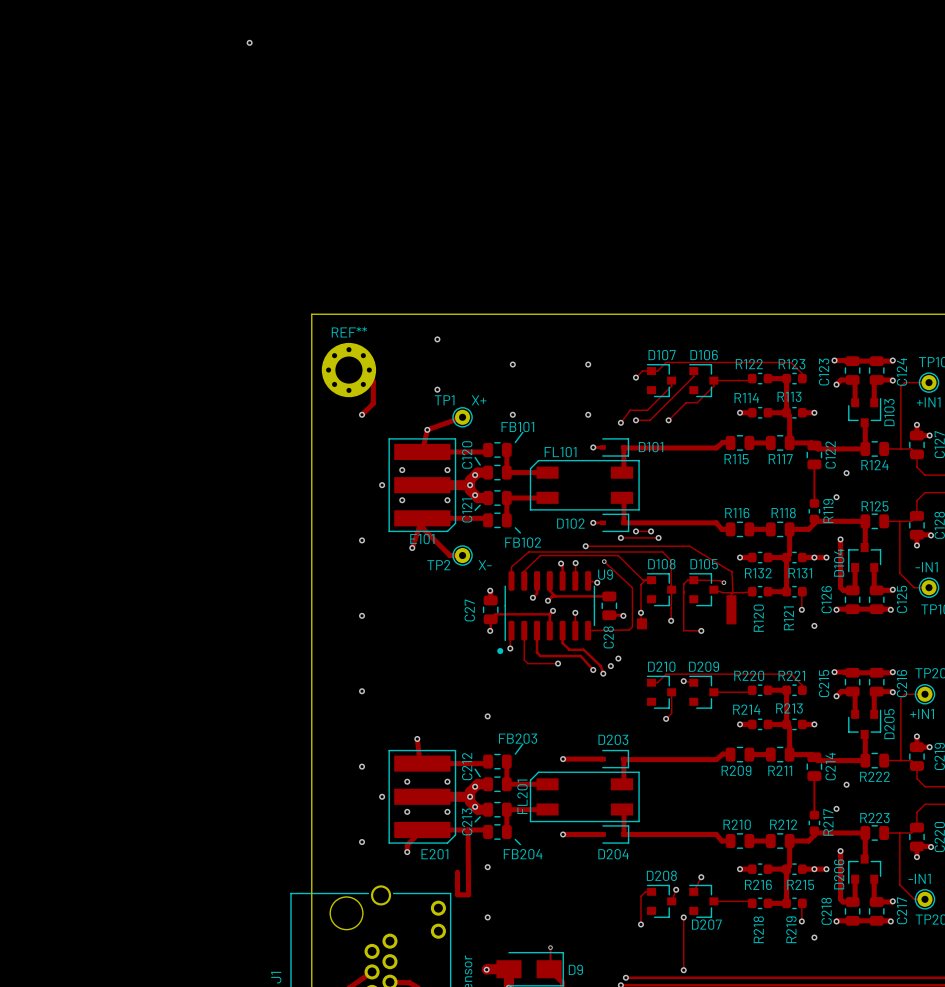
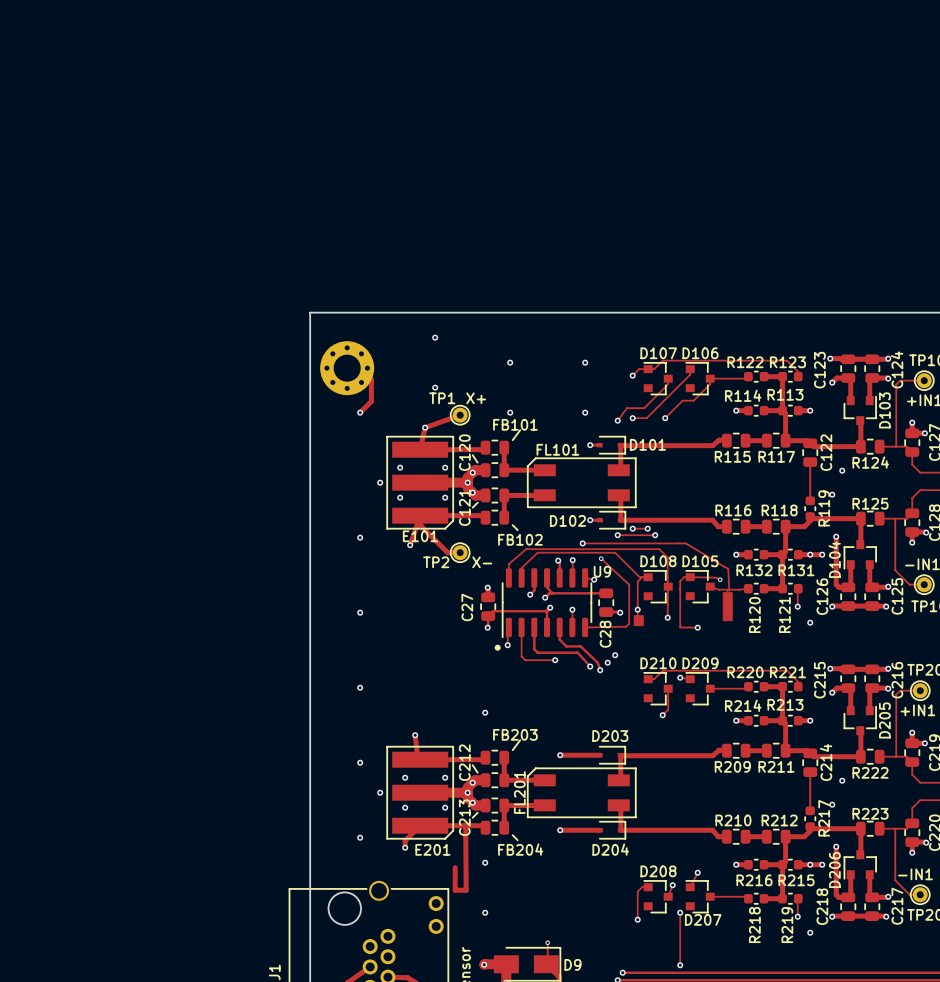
via: (249, 42) -> none
REF** name: REF** (349, 332) -> none

